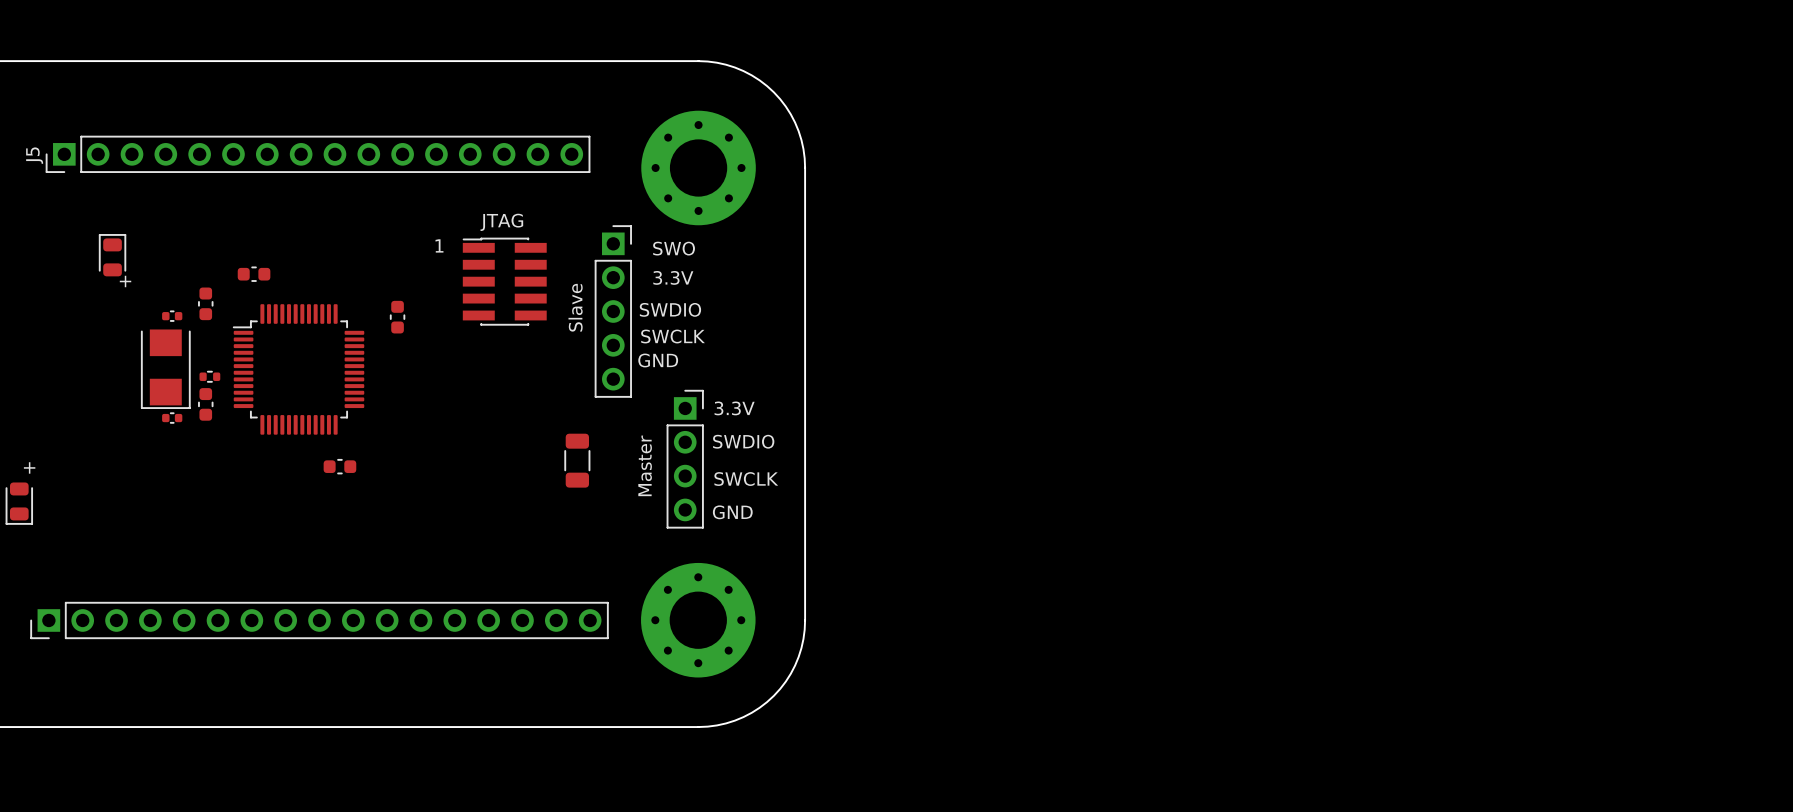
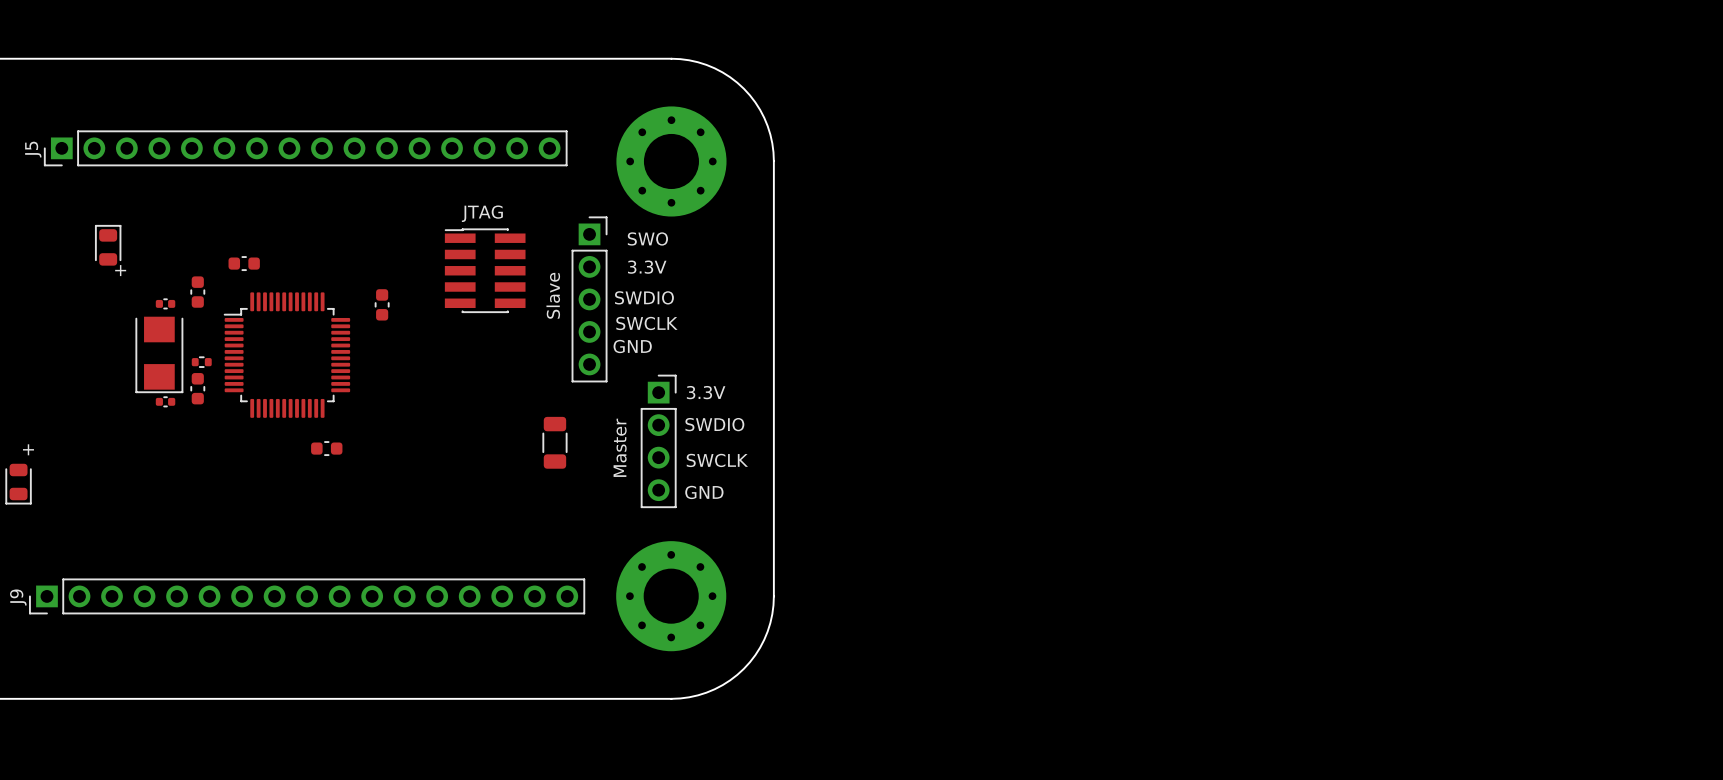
text: 1 (439, 245) -> none
J9 name: none -> J9 (18, 597)

